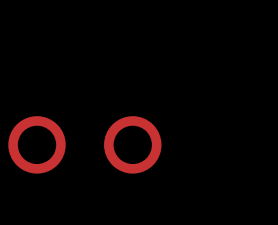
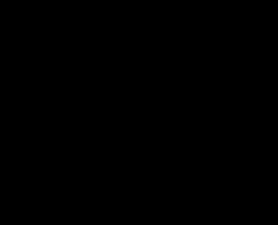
part: (37, 144) -> none
part: (132, 144) -> none

